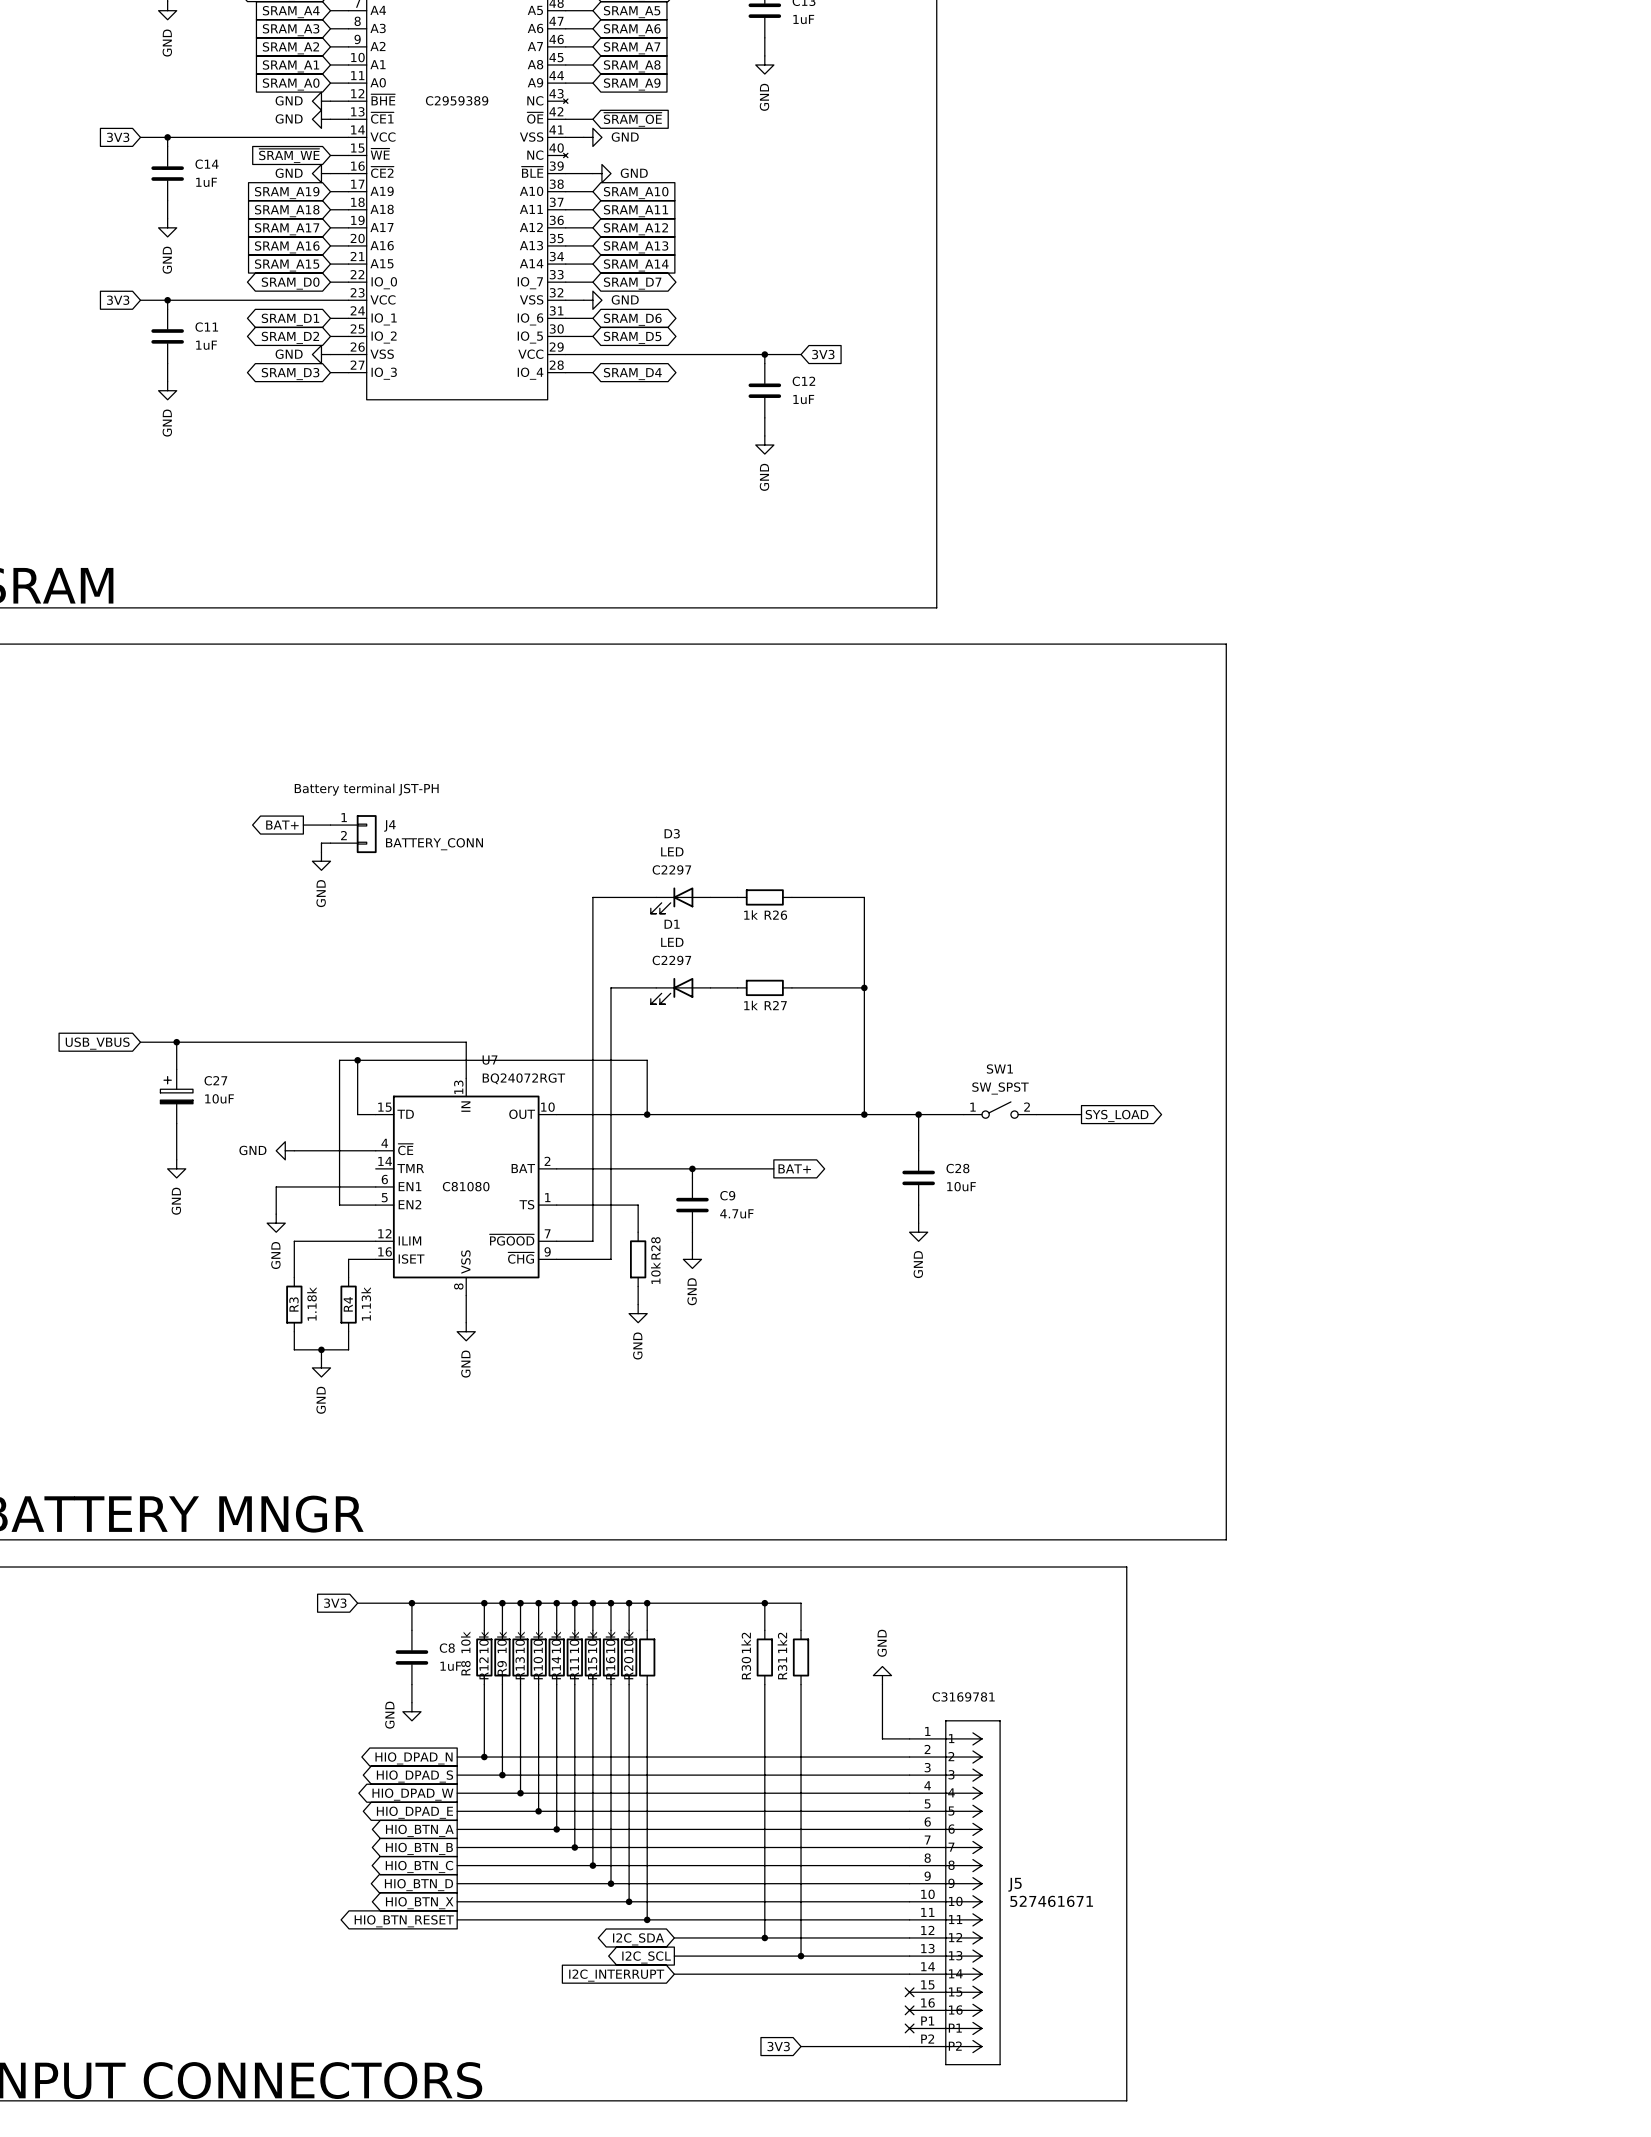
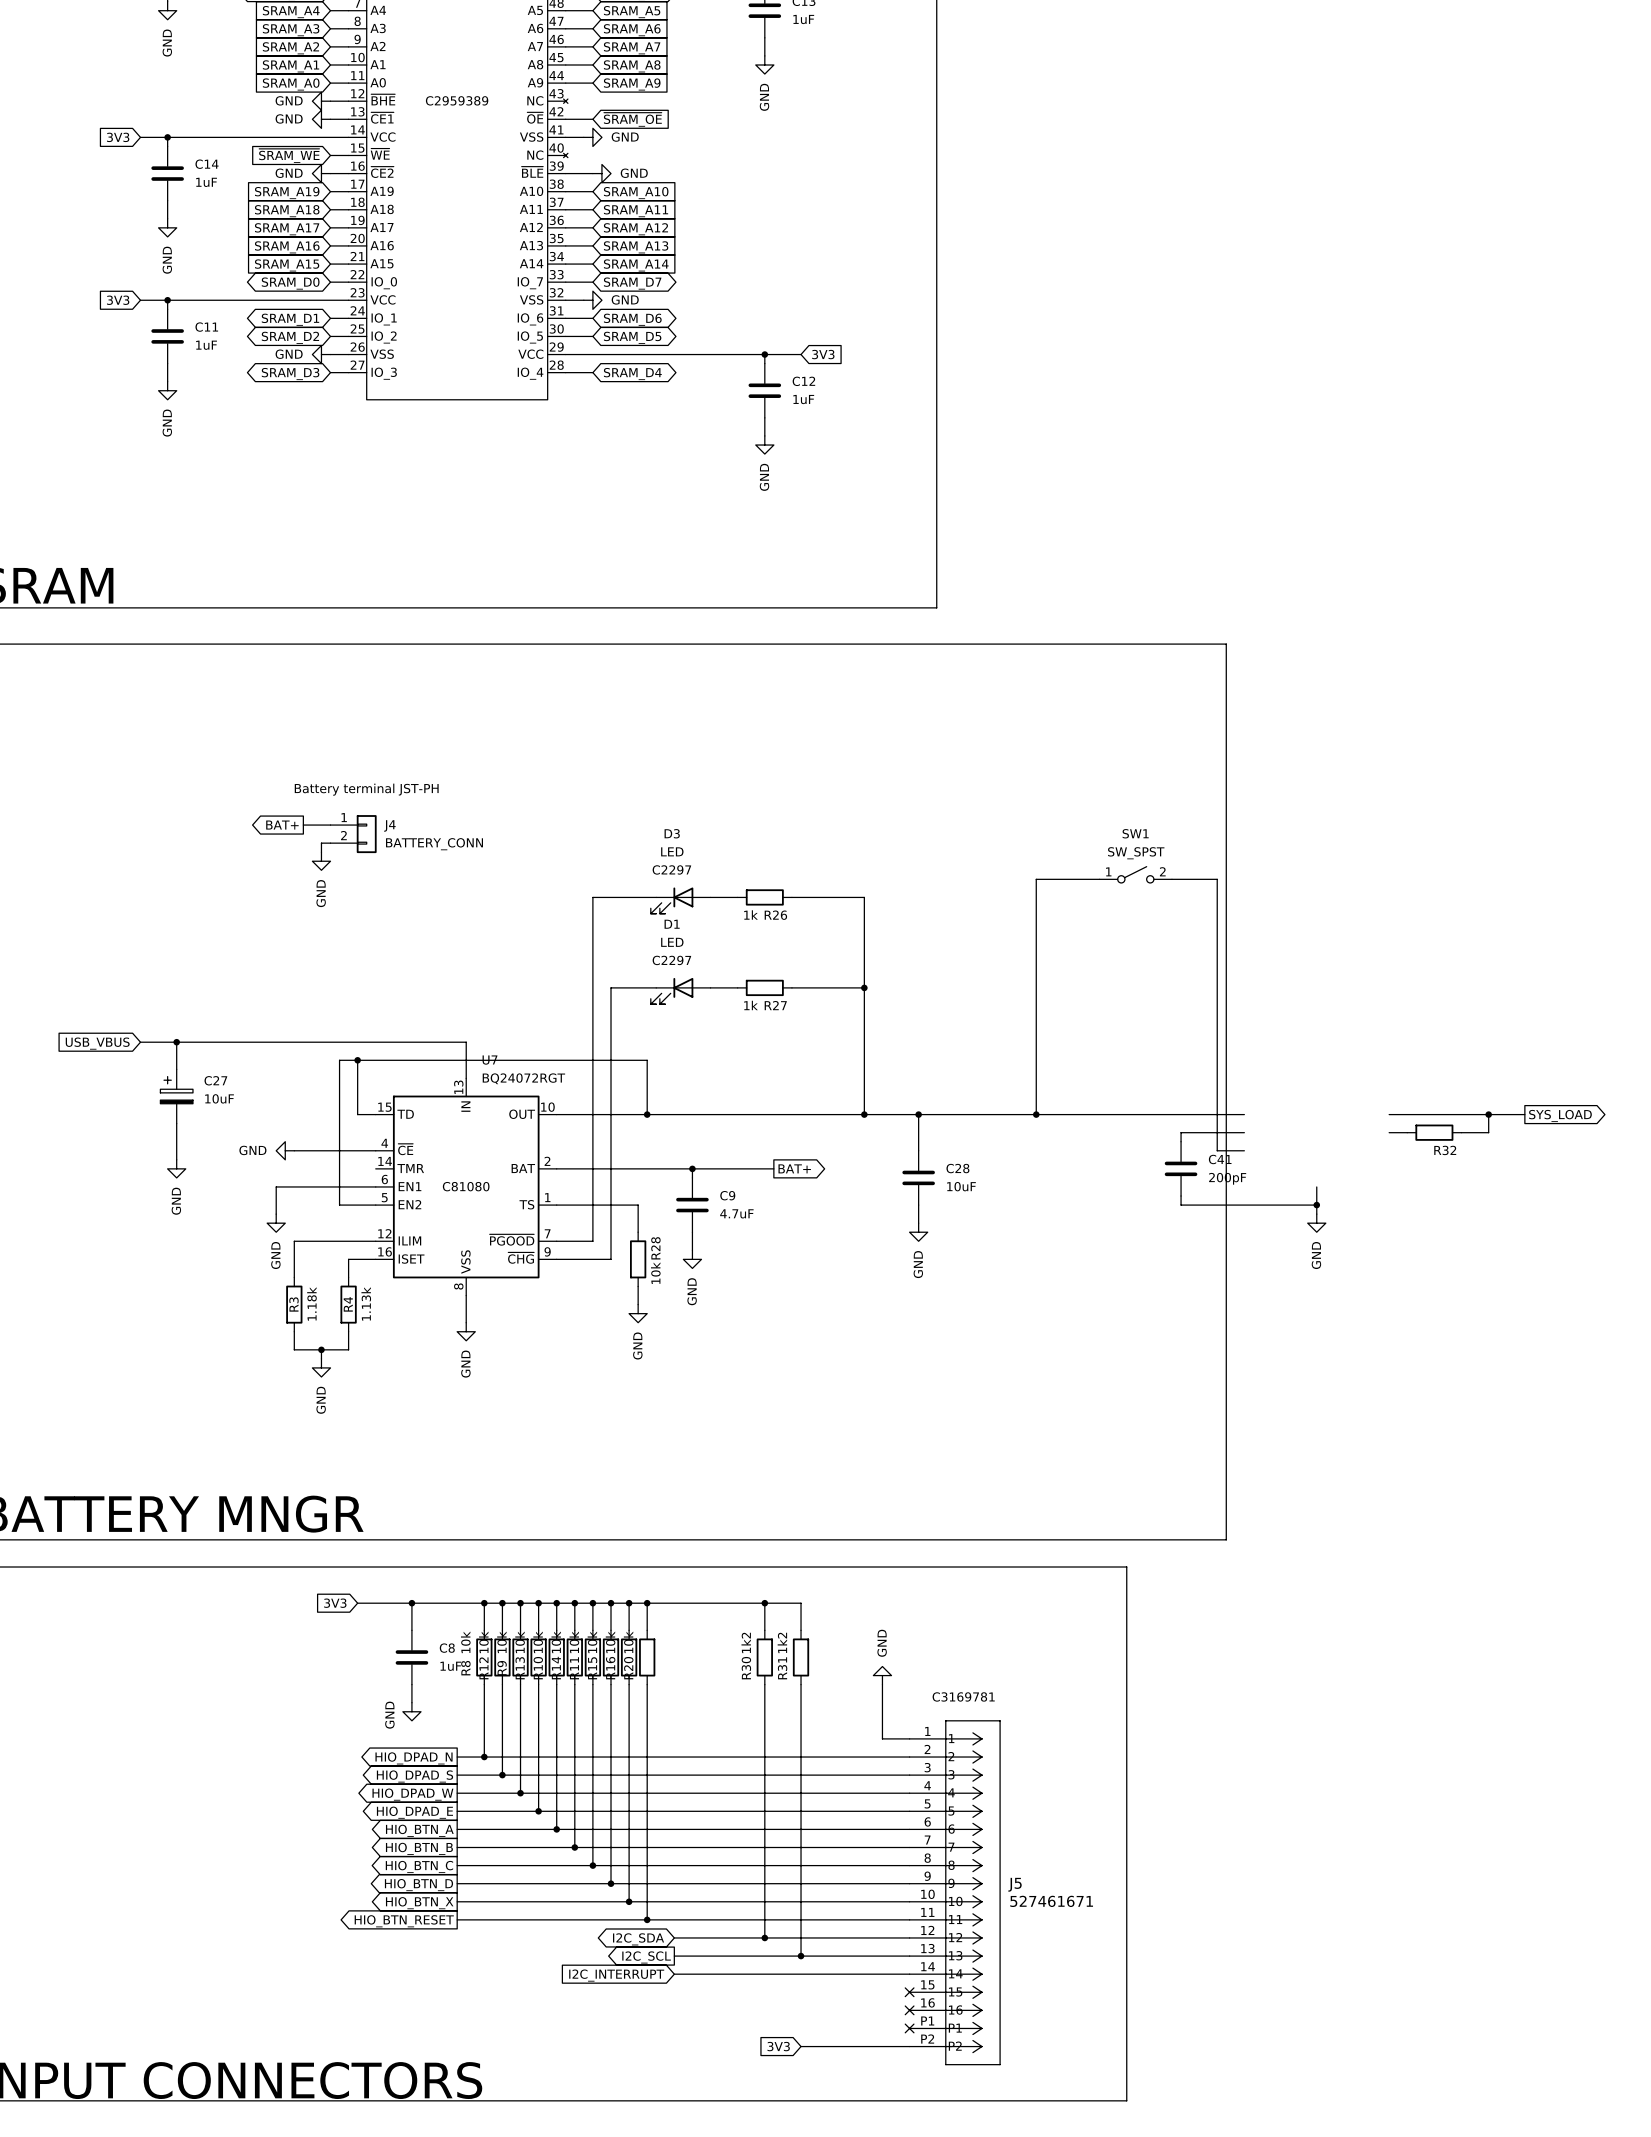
wire: none -> (1099, 879) (1036, 879) (1036, 1114) (963, 1114)
wire: none -> (1171, 879) (1217, 879) (1217, 1150) (1244, 1150)
SW1 position: (1000, 1110) -> (1135, 874)
junction: none -> (1036, 1114)
wire: none -> (1081, 1114) (1244, 1114)
wire: none -> (1389, 1114) (1524, 1114)
wire: none -> (1488, 1114) (1488, 1132) (1461, 1132)
junction: none -> (1488, 1114)
global label: SYS_LOAD (1117, 1115) -> none
global label: none -> SYS_LOAD (1560, 1115)
wire: none -> (1244, 1132) (1181, 1132) (1181, 1141)
wire: none -> (1389, 1132) (1407, 1132)
R32: none -> (1434, 1132)
C41: none -> 200pF (1181, 1168)
wire: none -> (1316, 1186) (1316, 1214)
wire: none -> (1181, 1196) (1181, 1205) (1316, 1205)
junction: none -> (1316, 1205)
power symbol: none -> GND (1316, 1223)

